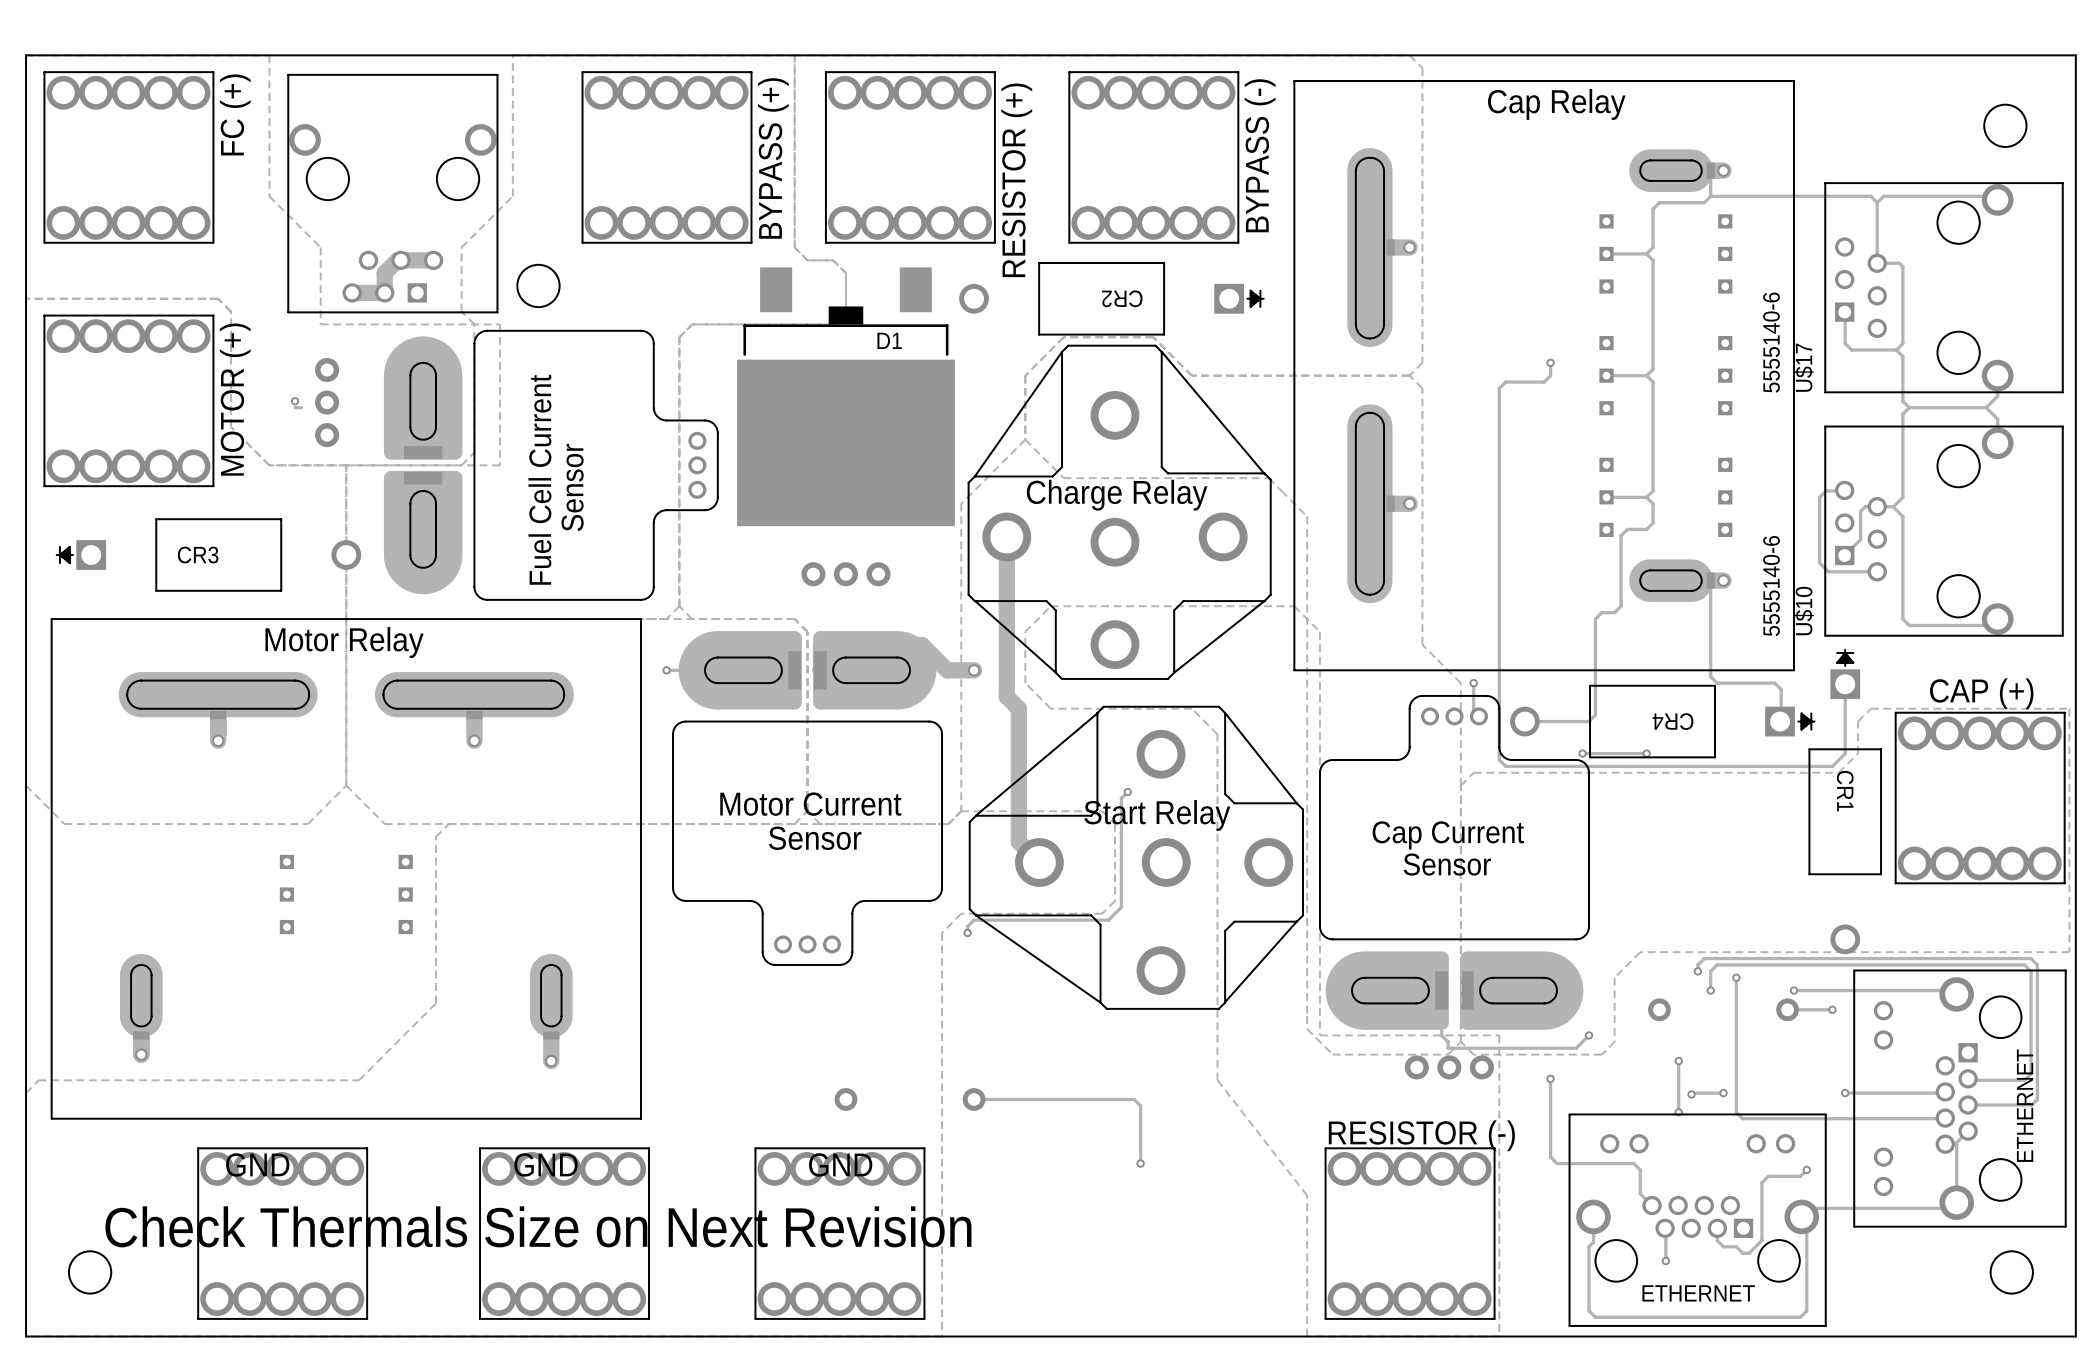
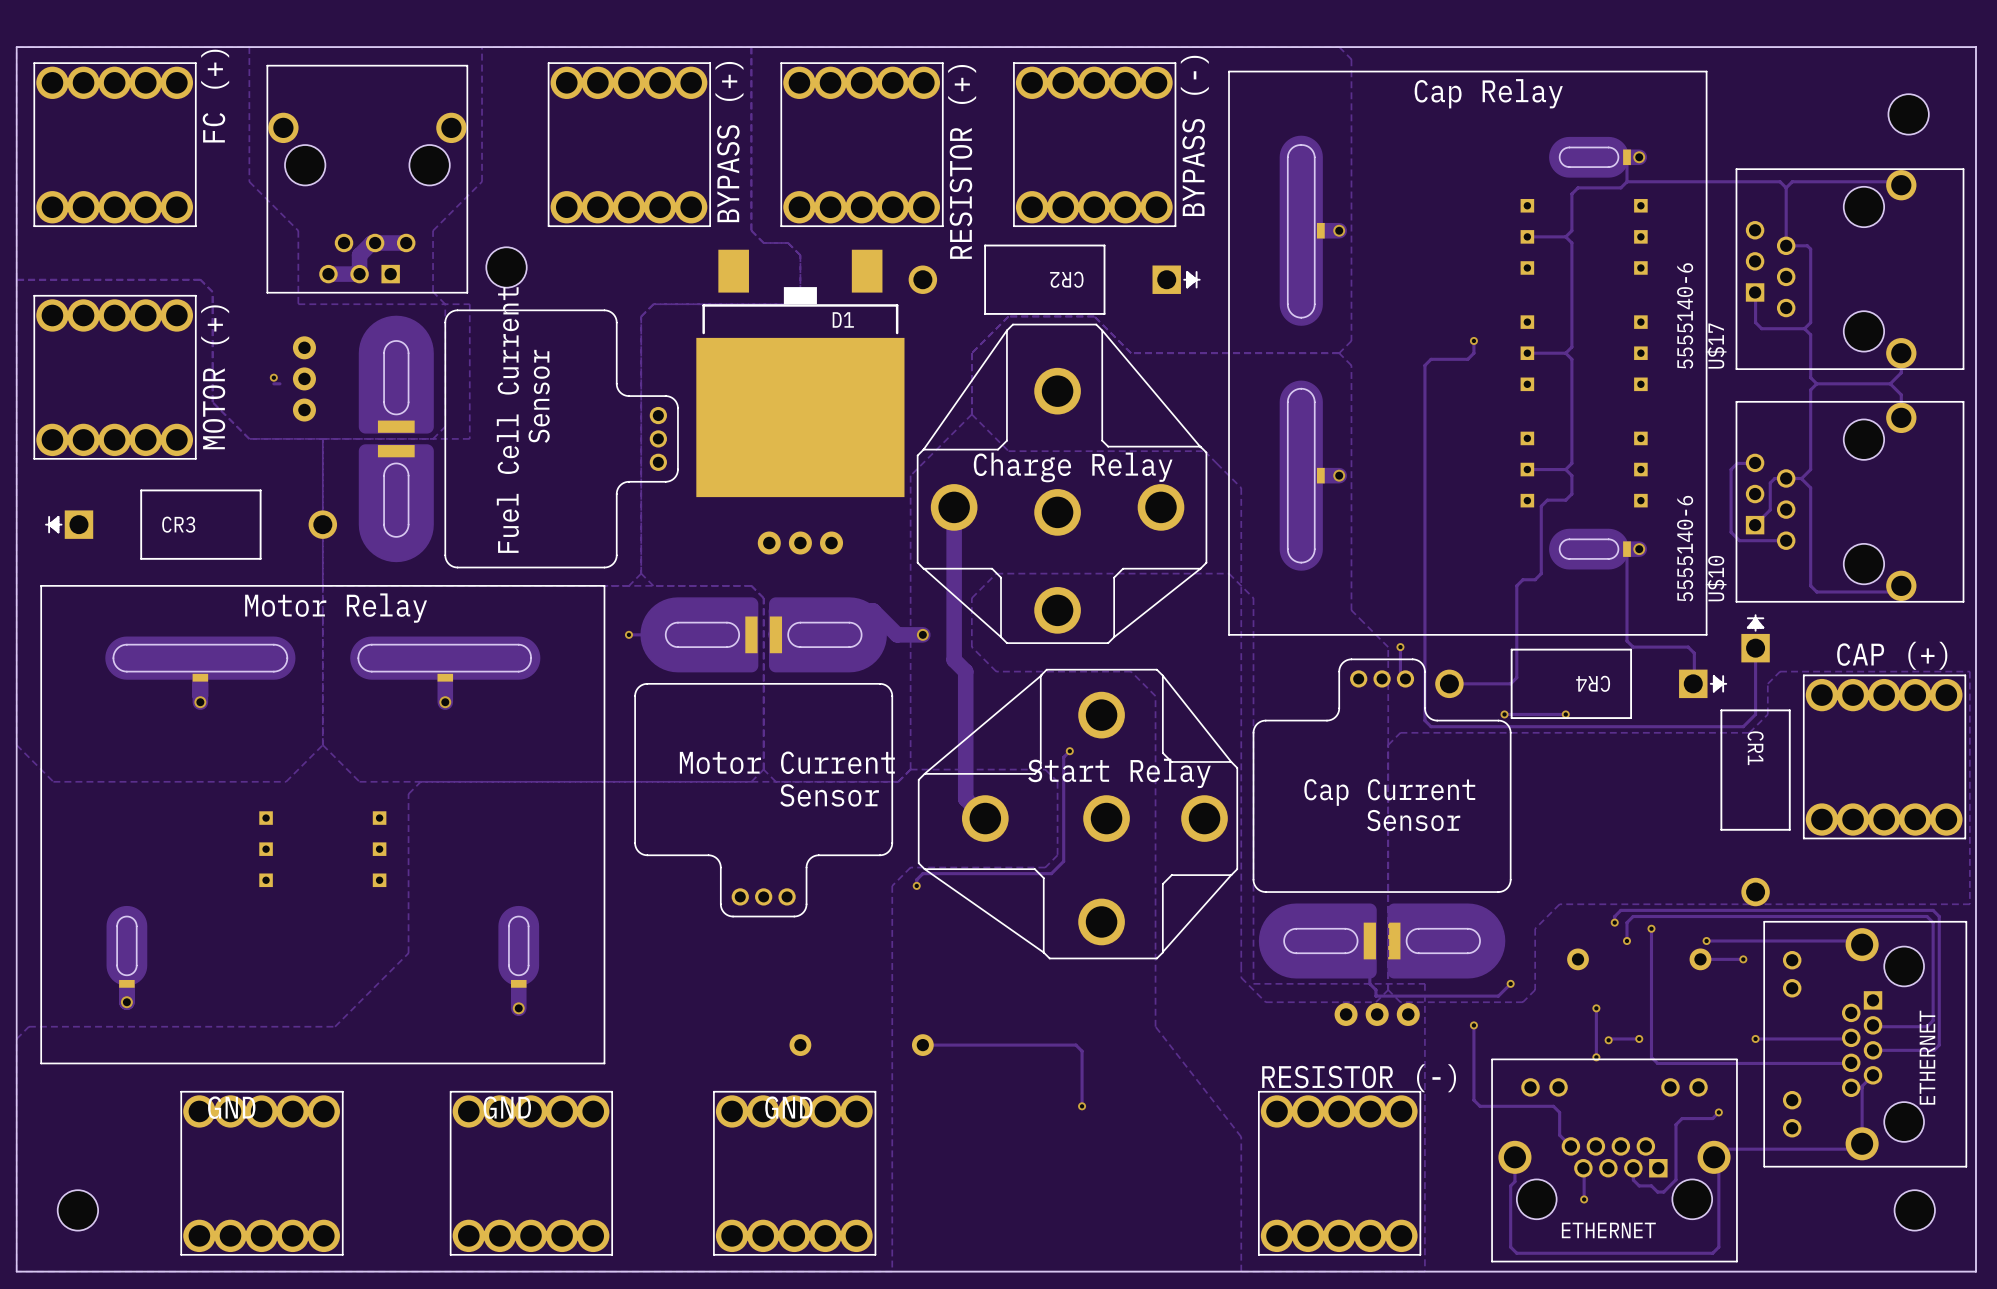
text: Check Thermals Size on Next Revision (538, 1226) -> none

